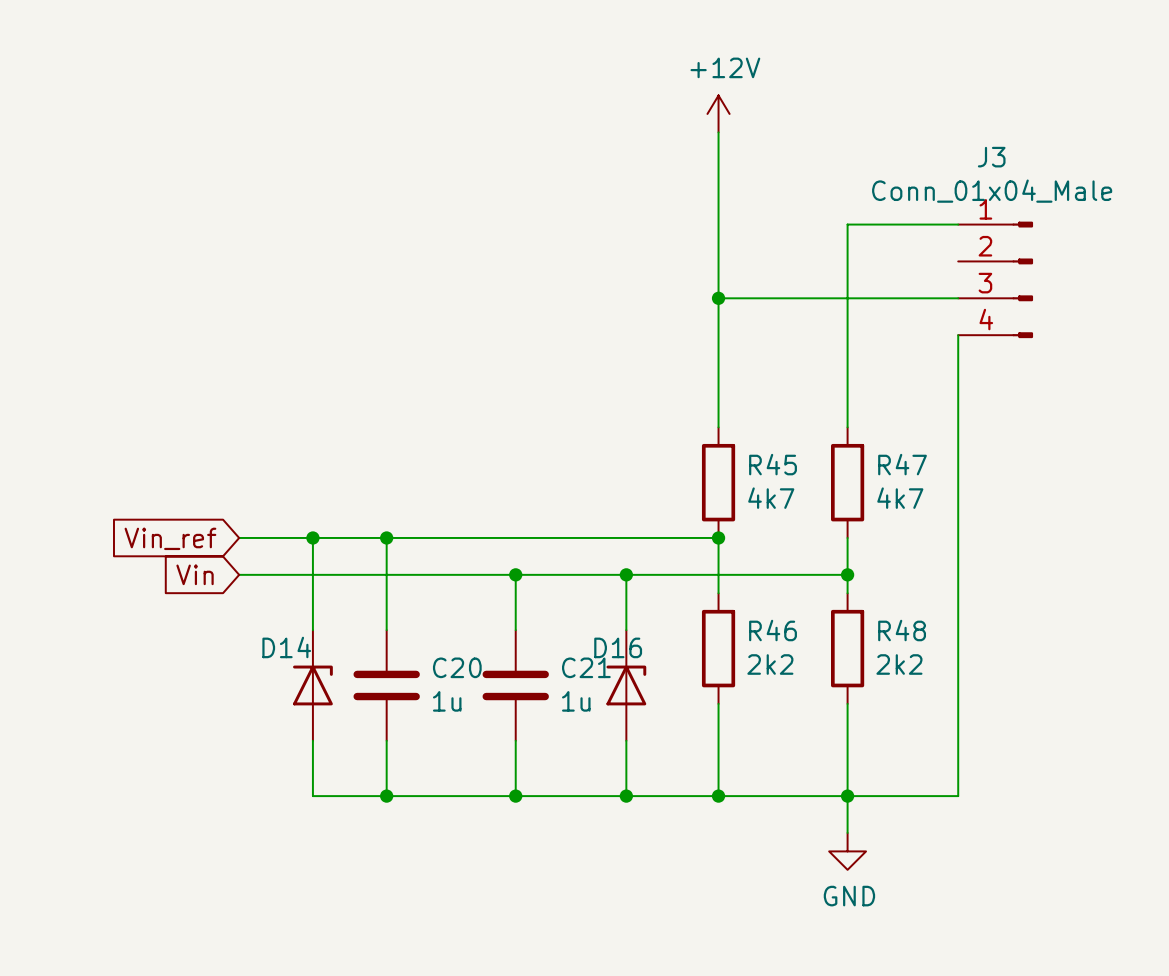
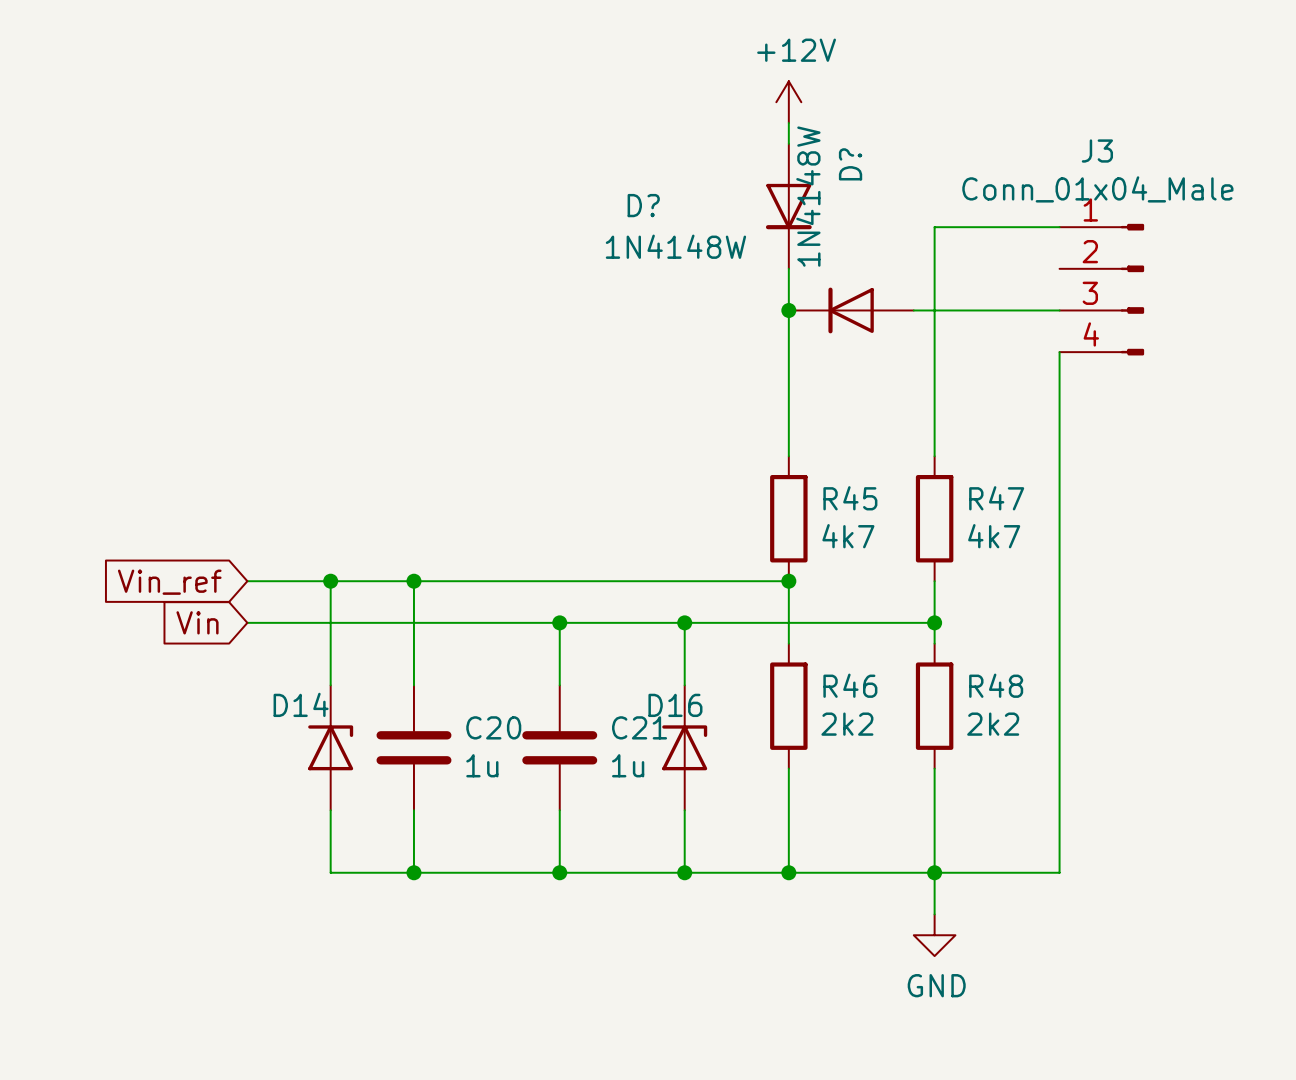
D?: none -> 1N4148W (788, 206)
D?: none -> 1N4148W (851, 310)

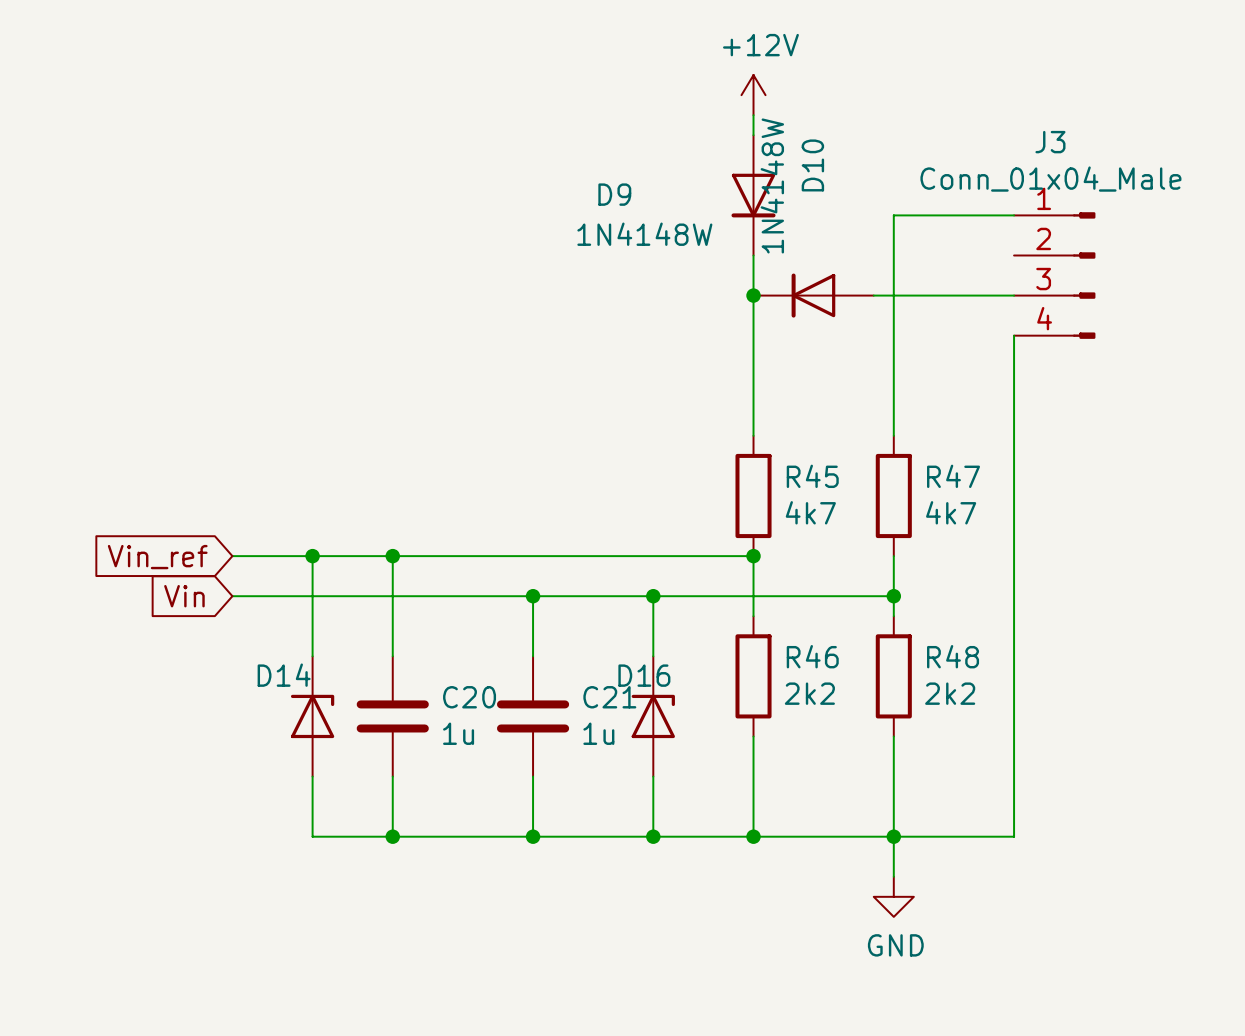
D? name: D? (850, 164) -> D10 (812, 165)
D? name: D? (643, 205) -> D9 (614, 194)

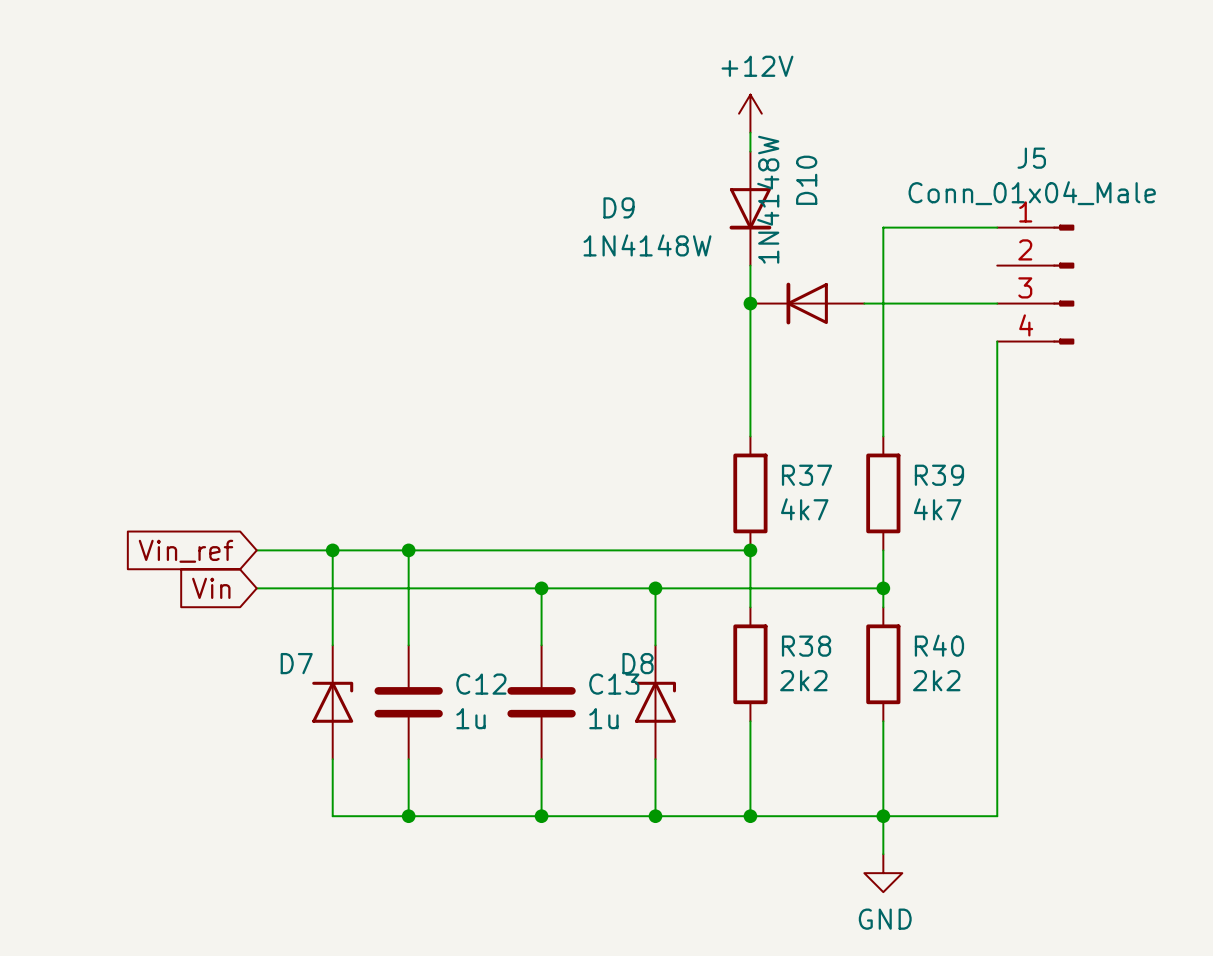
J3 name: J3 (1050, 142) -> J5 (1031, 158)
R45 name: R45 (812, 476) -> R37 (806, 475)
R47 name: R47 (953, 476) -> R39 (939, 475)
R46 name: R46 (812, 656) -> R38 (806, 646)
R48 name: R48 (953, 656) -> R40 (939, 645)
D14 name: D14 (284, 675) -> D7 (296, 663)
D16 name: D16 (644, 675) -> D8 (638, 663)
C20 name: C20 (469, 697) -> C12 (481, 684)
C21 name: C21 (609, 697) -> C13 (614, 684)

